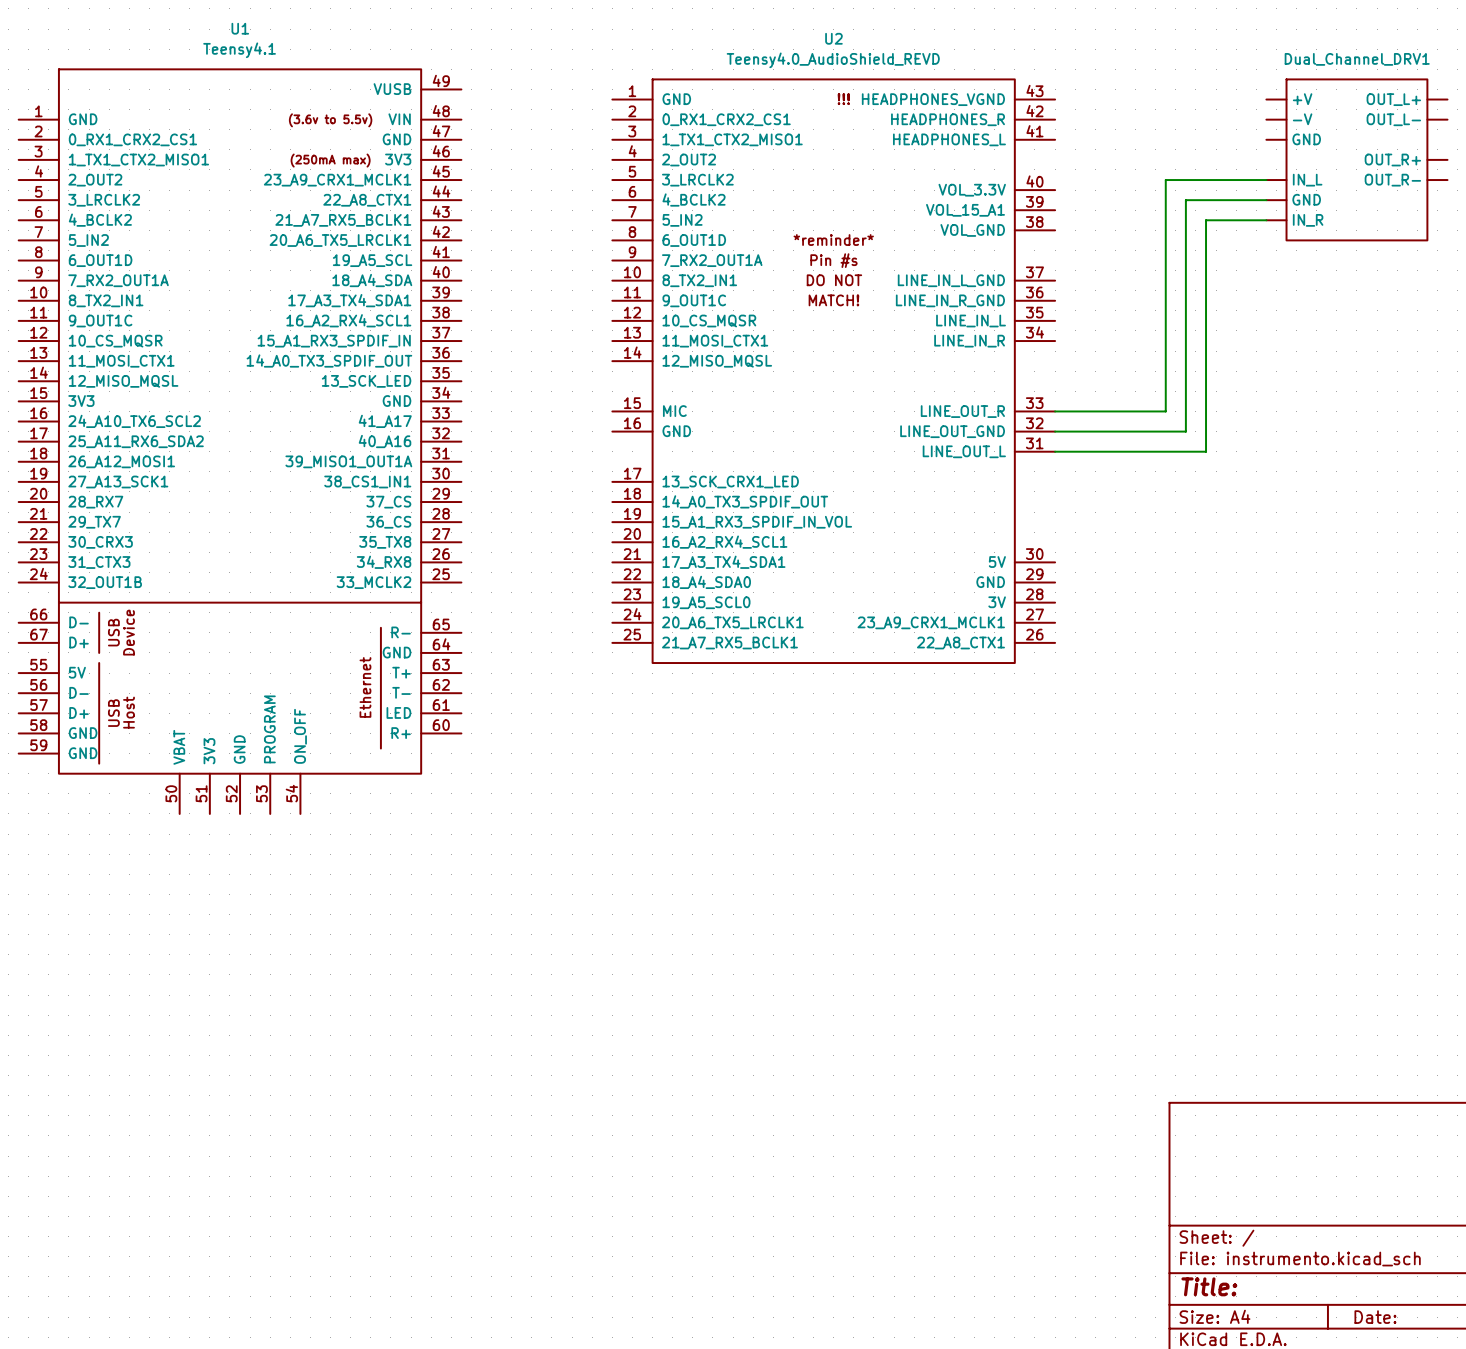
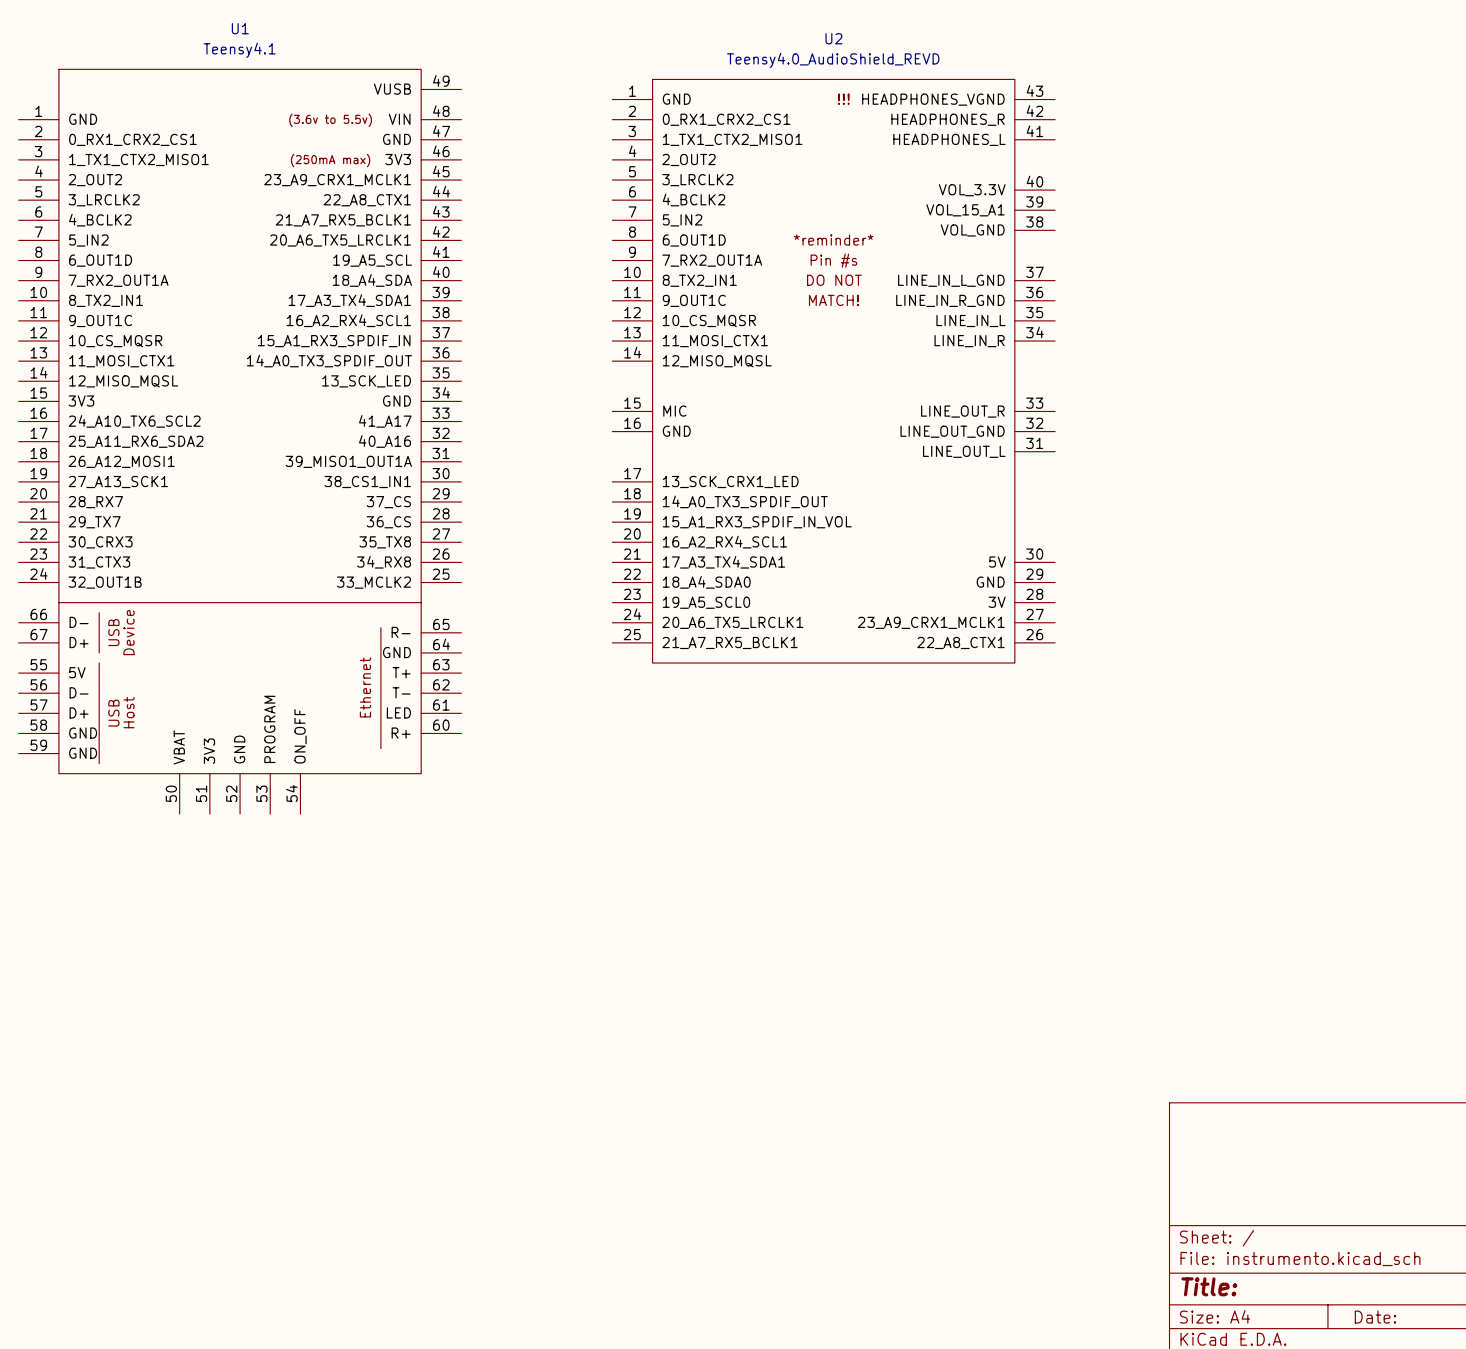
Dual_Channel_DRV1: (1356, 159) -> none
wire: (1266, 180) (1165, 180) (1165, 411) (1055, 411) -> none
wire: (1266, 200) (1185, 200) (1185, 431) (1055, 431) -> none
wire: (1266, 220) (1206, 220) (1206, 451) (1055, 451) -> none

